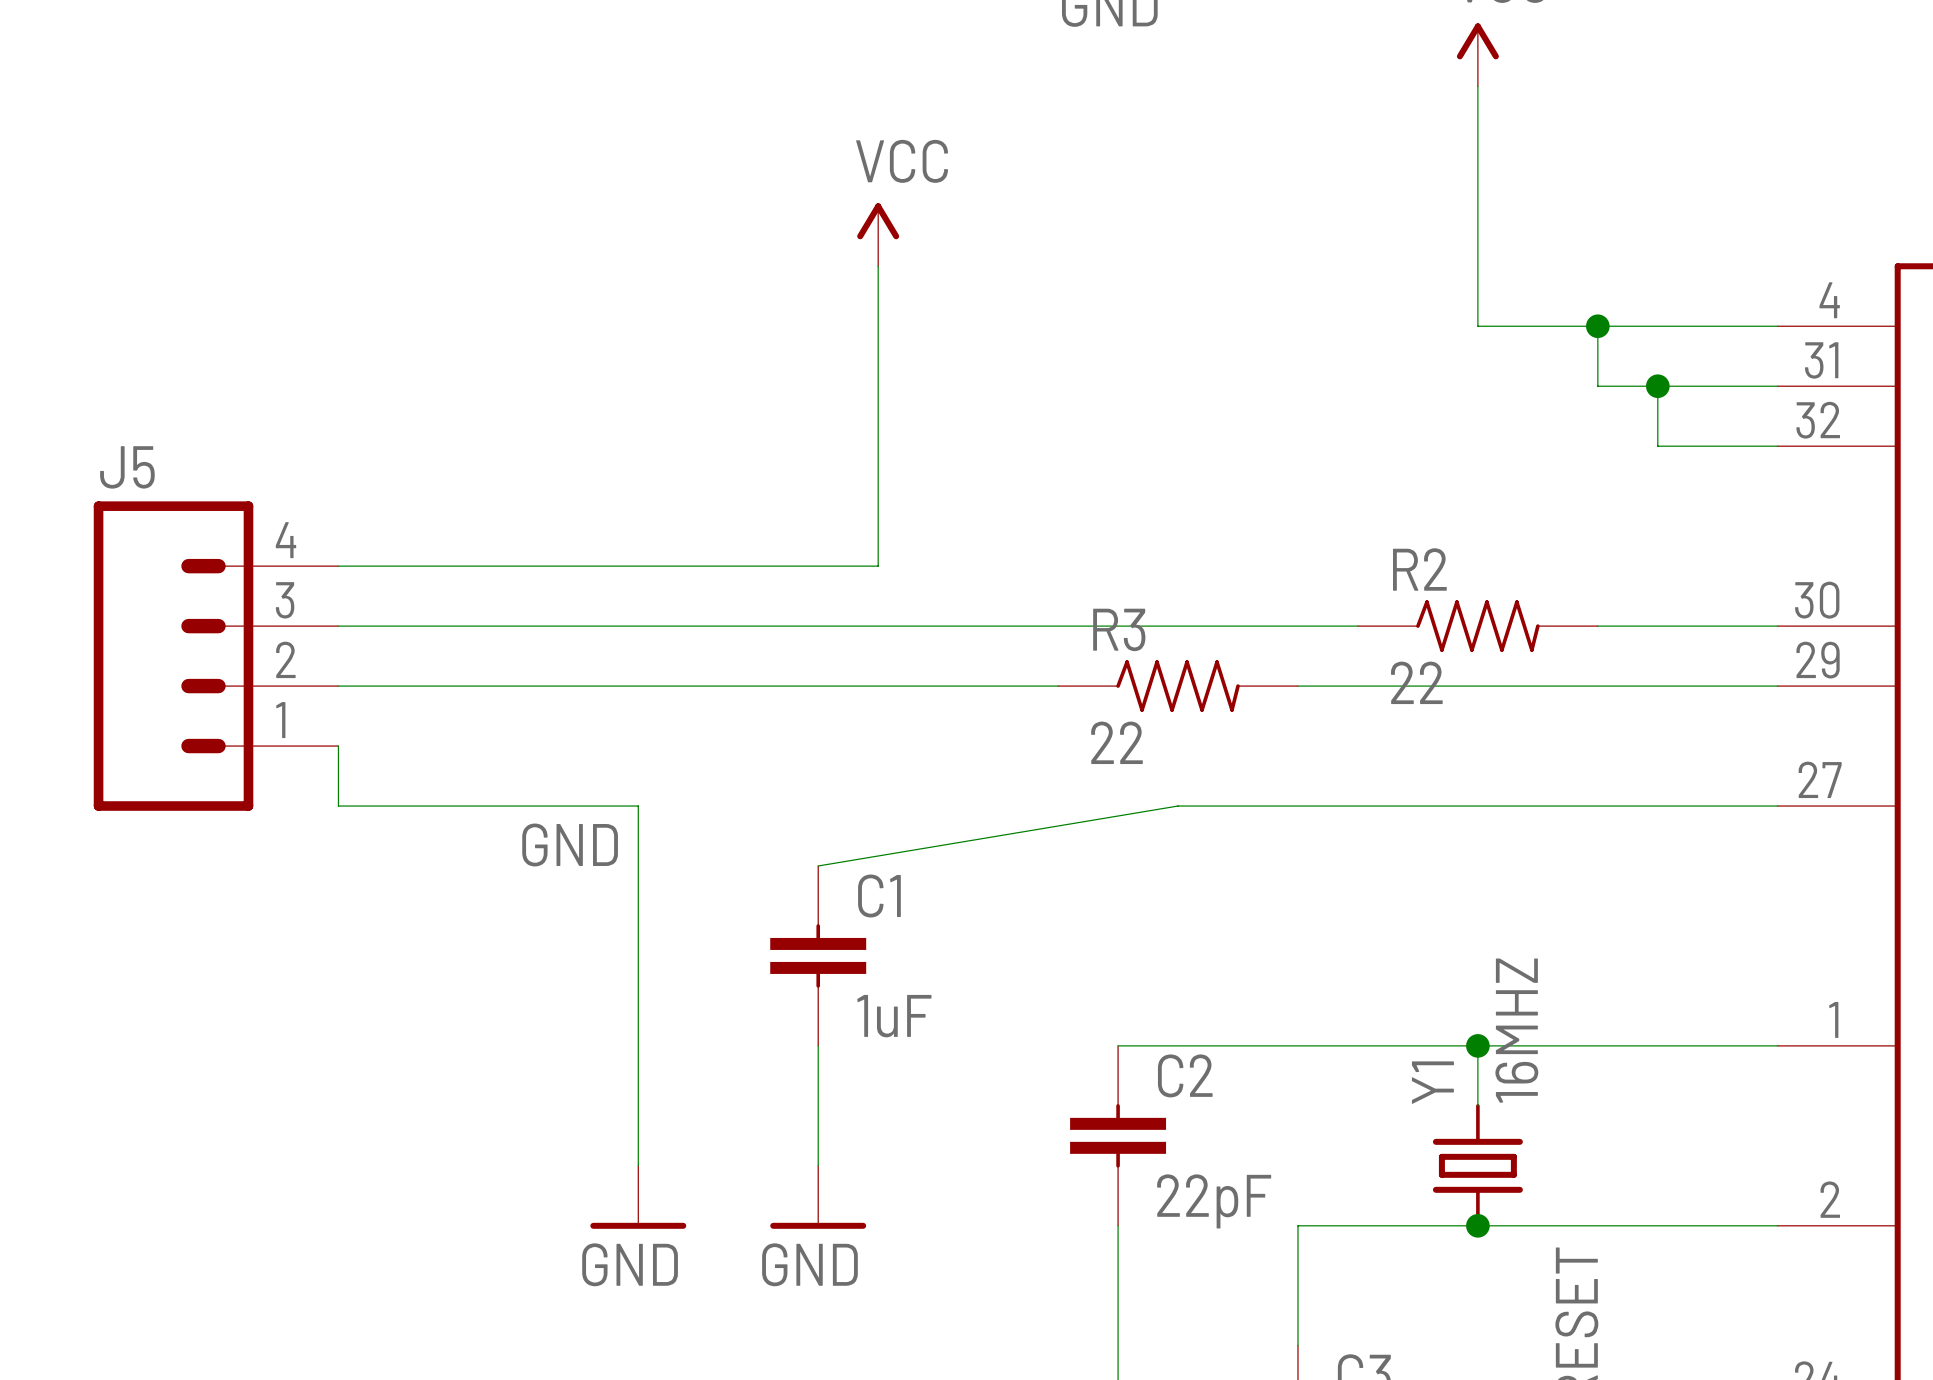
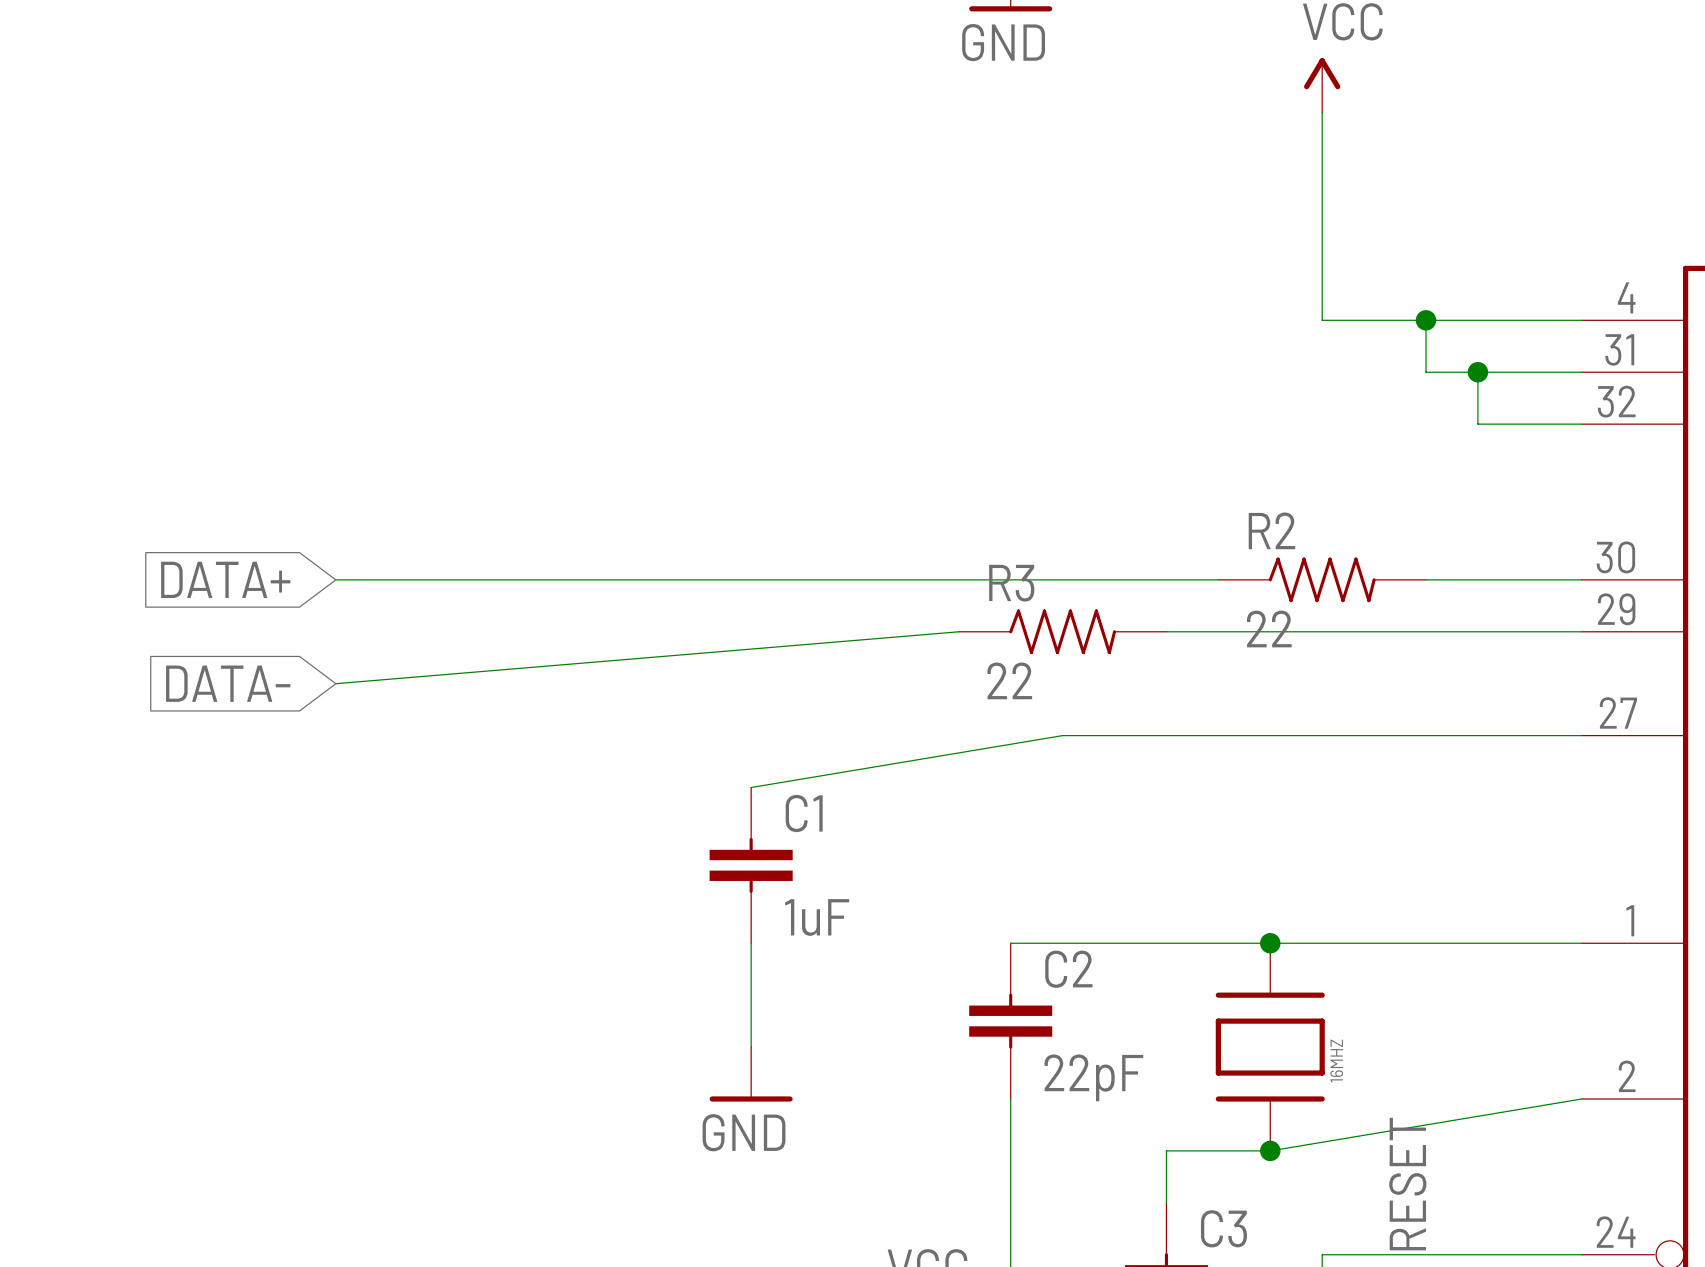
power symbol: VCC (878, 234) -> none
wire: (878, 266) (878, 566) (338, 566) -> none
global label: none -> DATA+ (225, 579)
J5: (216, 656) -> none
wire: (338, 686) (1058, 686) -> (335, 683) (958, 631)
global label: none -> DATA- (228, 683)
wire: (338, 746) (338, 806) (638, 806) (638, 1165) -> none
label: GND (570, 844) -> none
wire: (1477, 1045) (1477, 1105) -> none
junction position: (1477, 1045) -> (1270, 943)
part: none -> 16MHZ (1270, 1047)
Y1: 16MHZ (1477, 1165) -> none
power symbol: GND (638, 1197) -> none
junction position: (1477, 1225) -> (1270, 1150)
wire: (1777, 1225) (1297, 1225) (1297, 1285) -> (1581, 1099) (1270, 1150) (1166, 1150)

